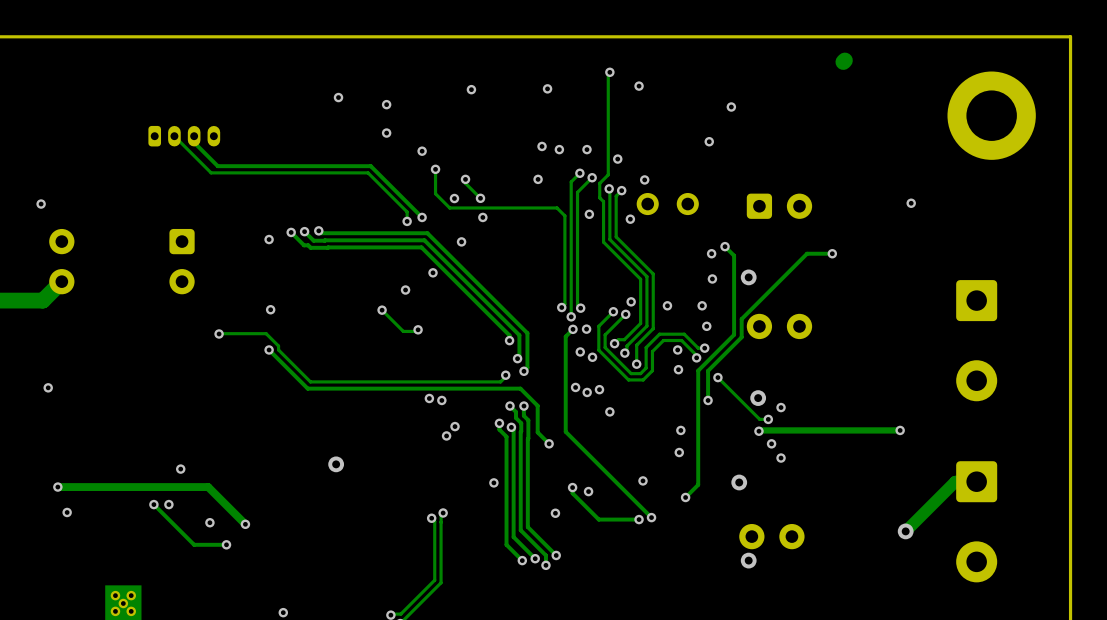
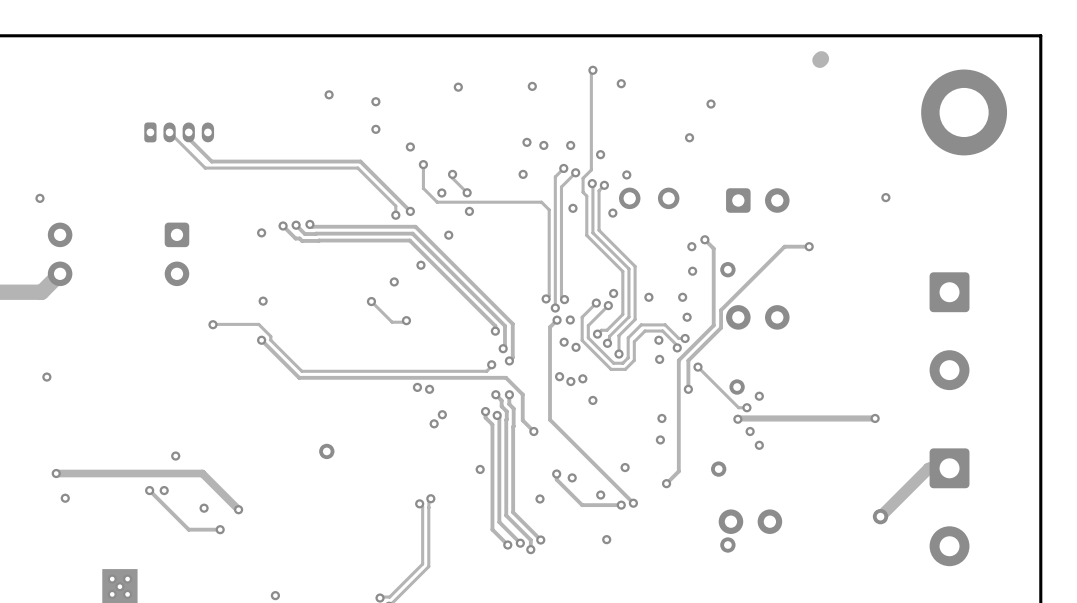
via: none -> (600, 495)
via: none -> (606, 539)

